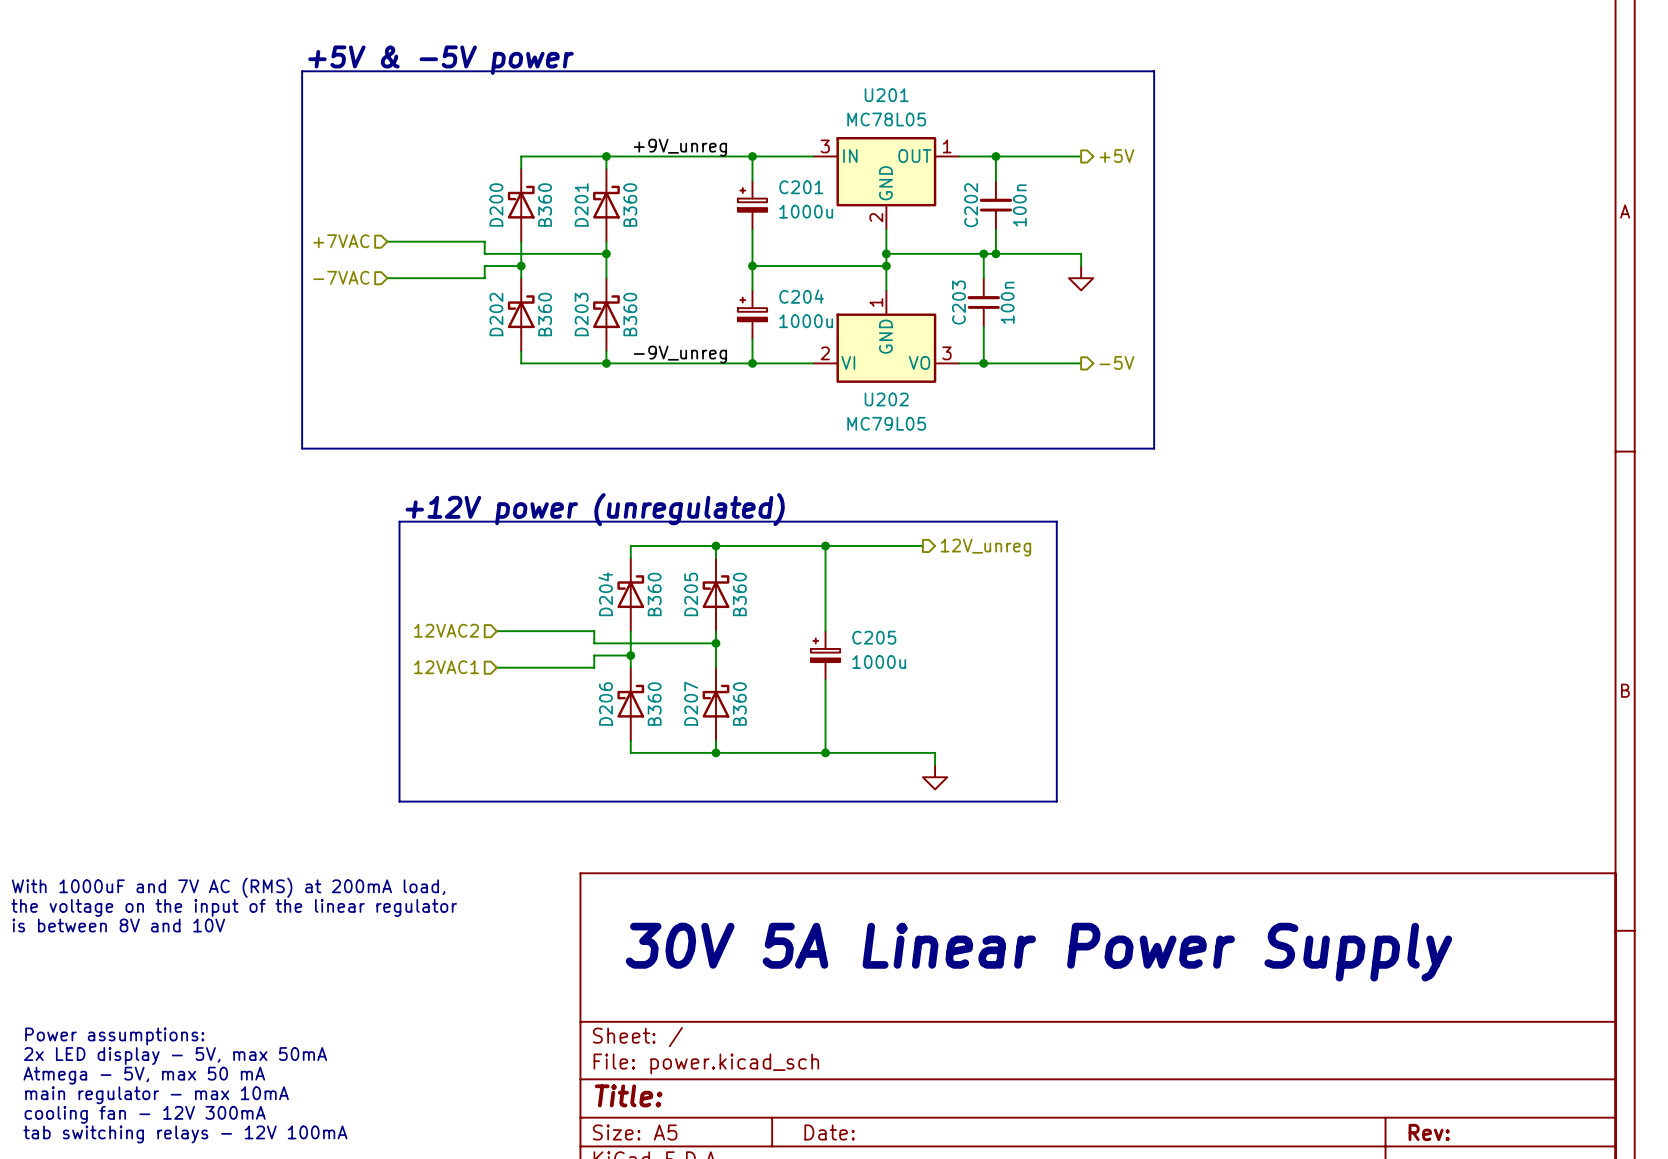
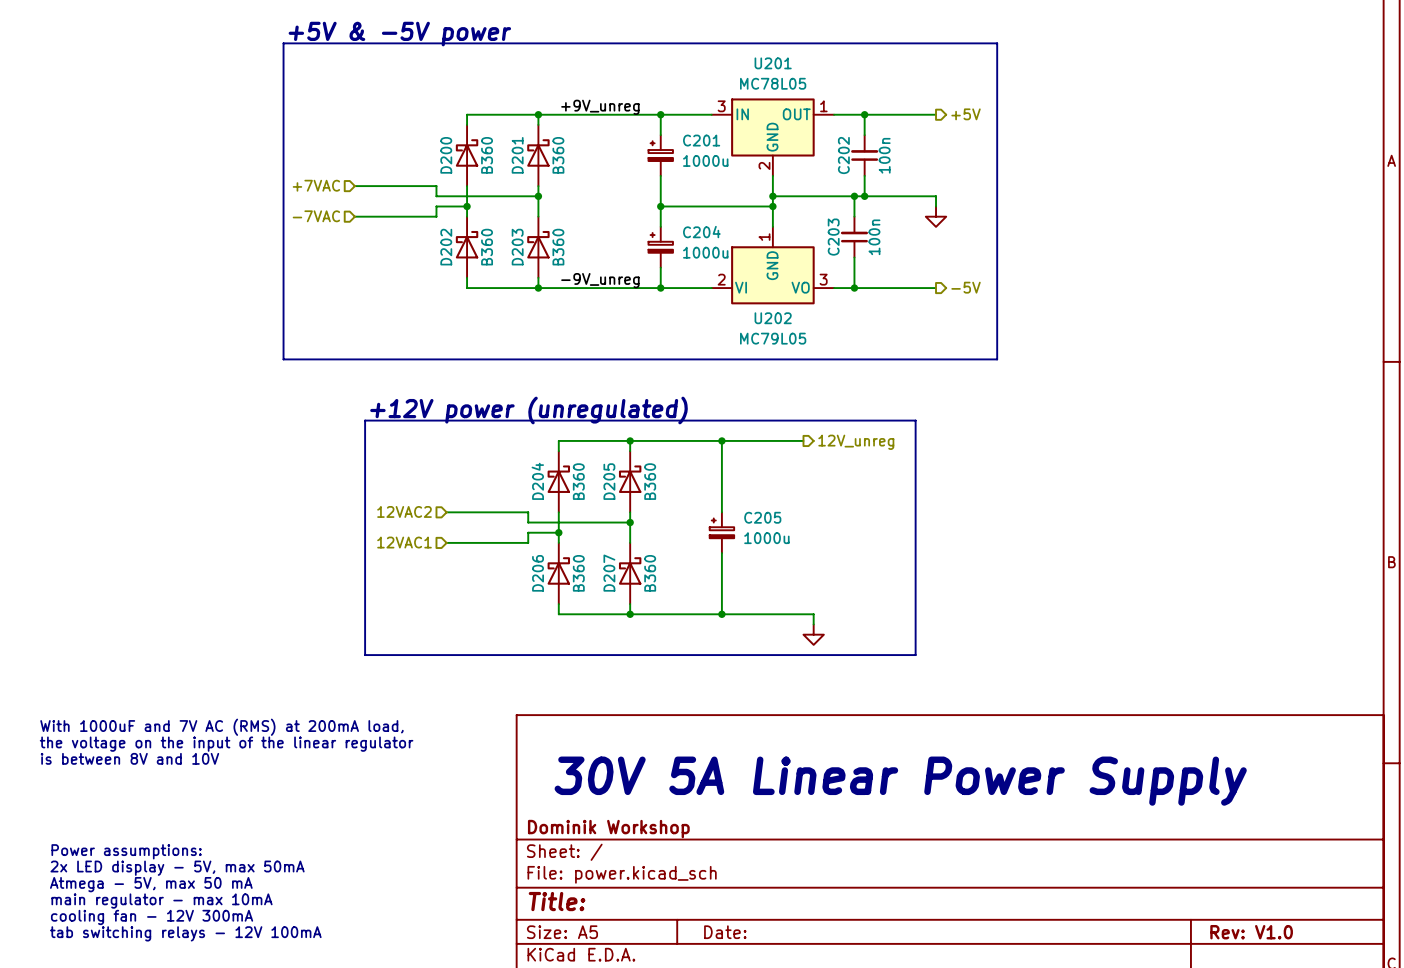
title block: none -> Dominik Workshop (608, 829)
title block: Rev: (1429, 1132) -> Rev: V1.0 (1251, 932)

